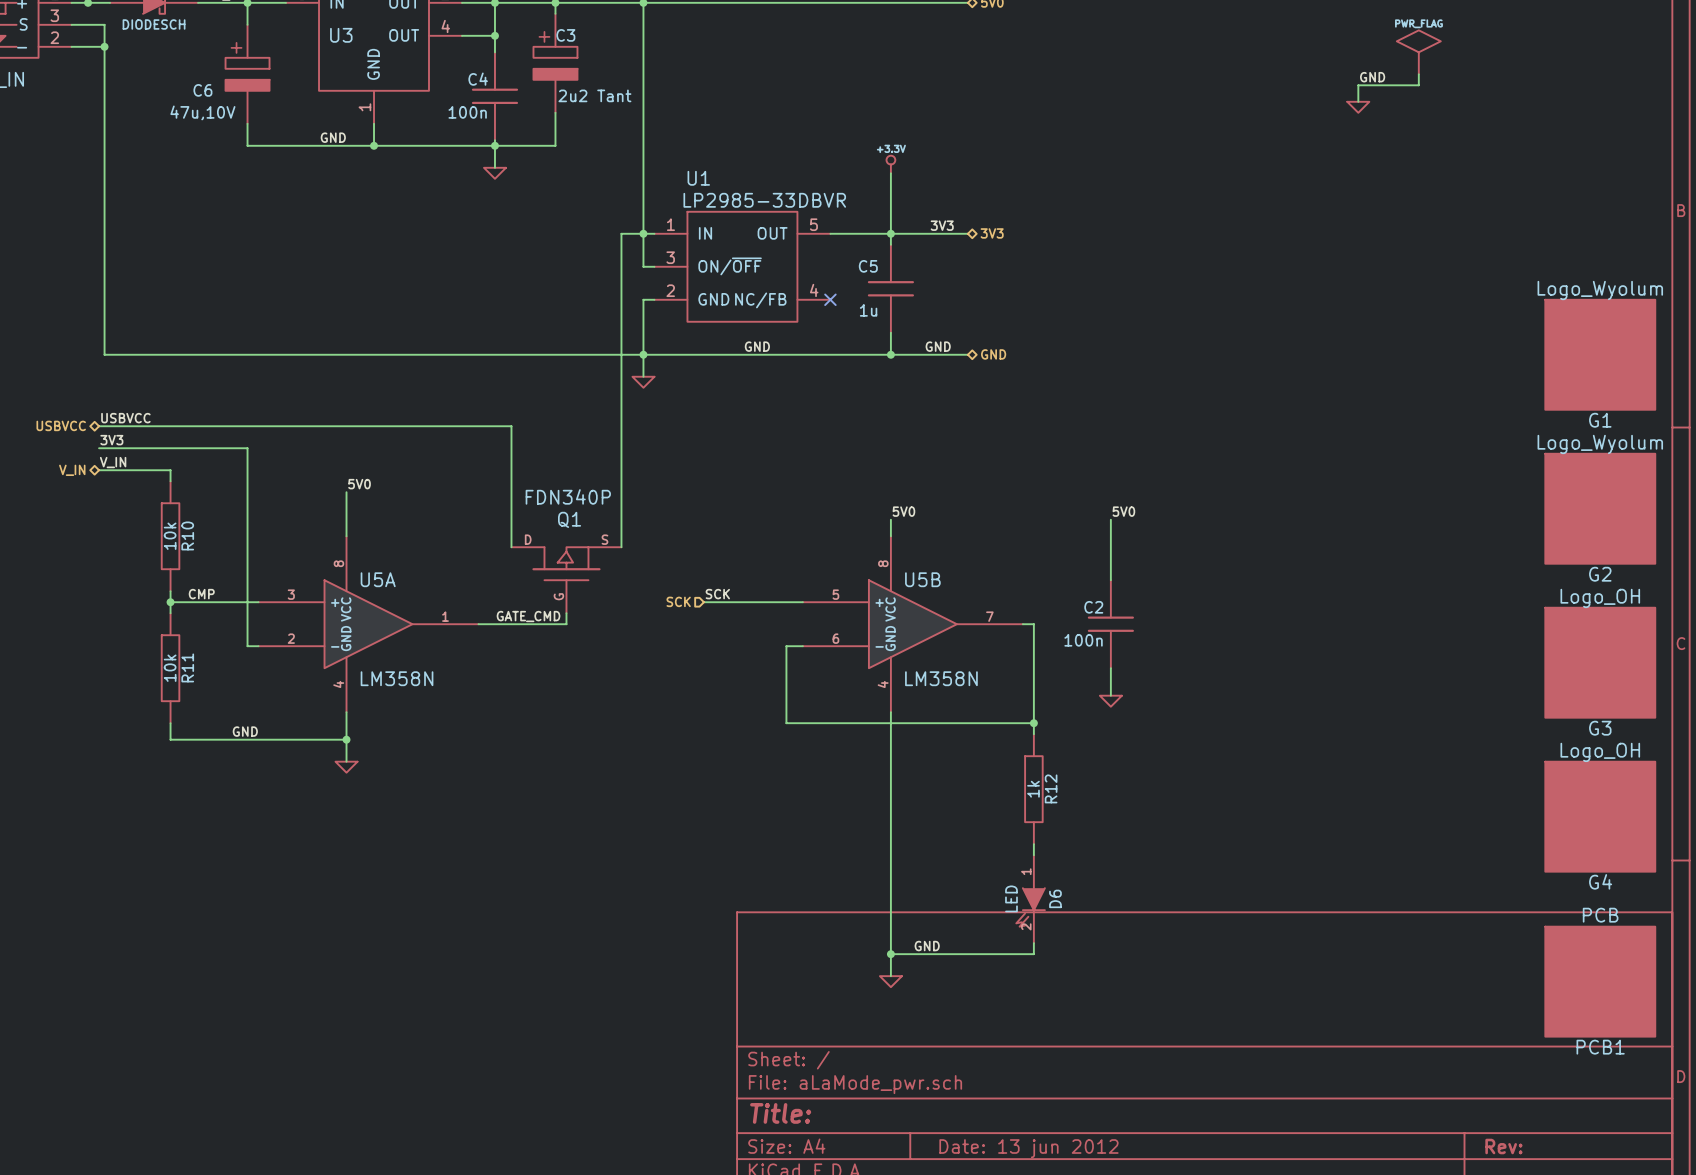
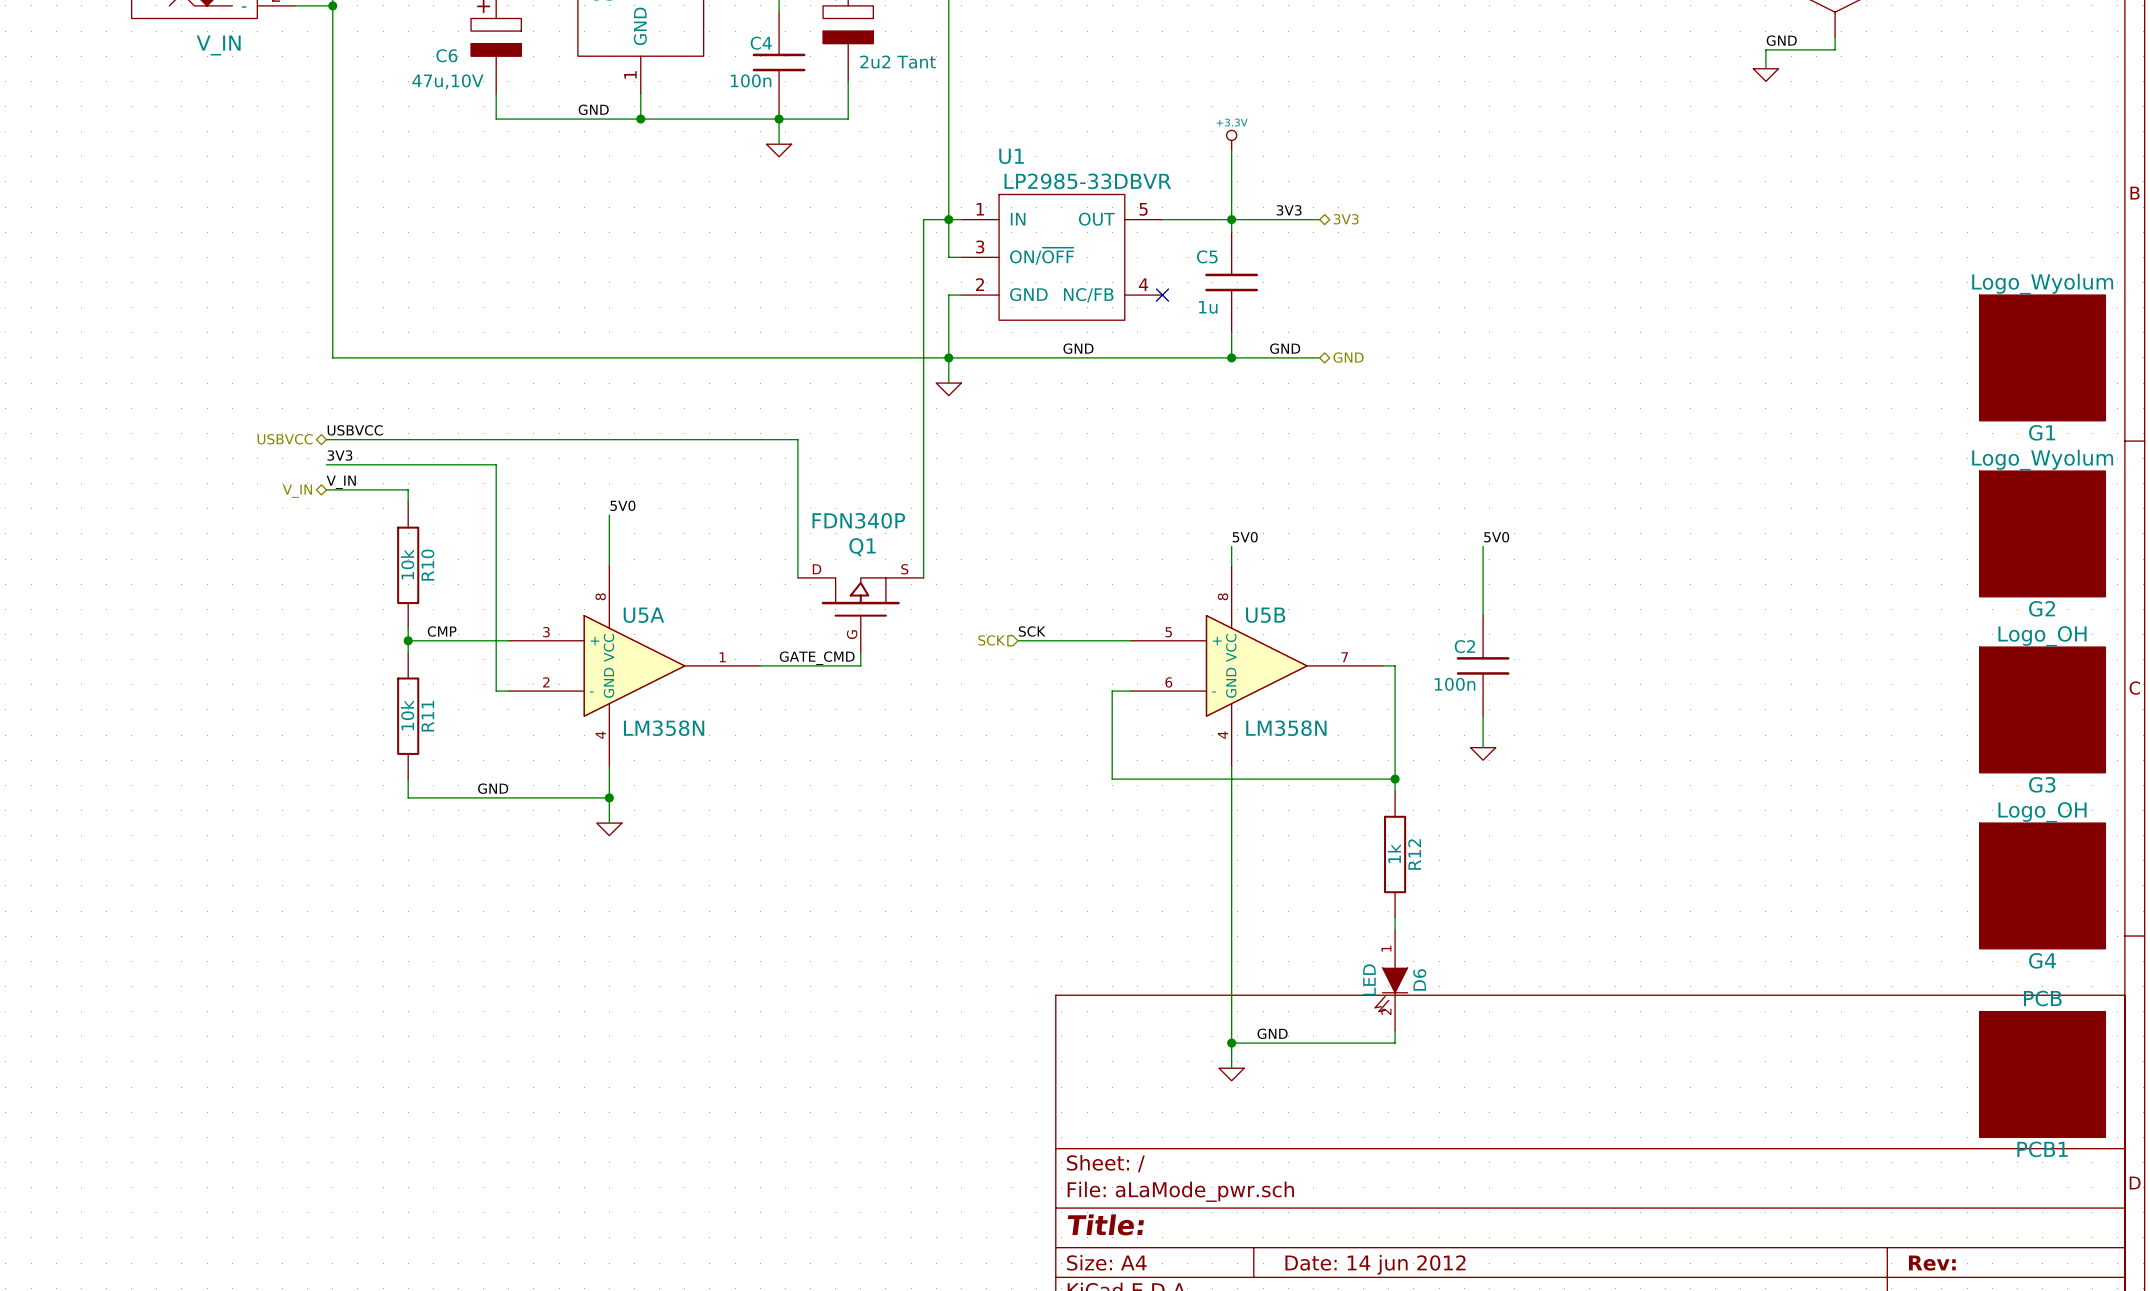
title block: Date: 13 jun 2012 (1028, 1148) -> Date: 14 jun 2012 (1375, 1264)

